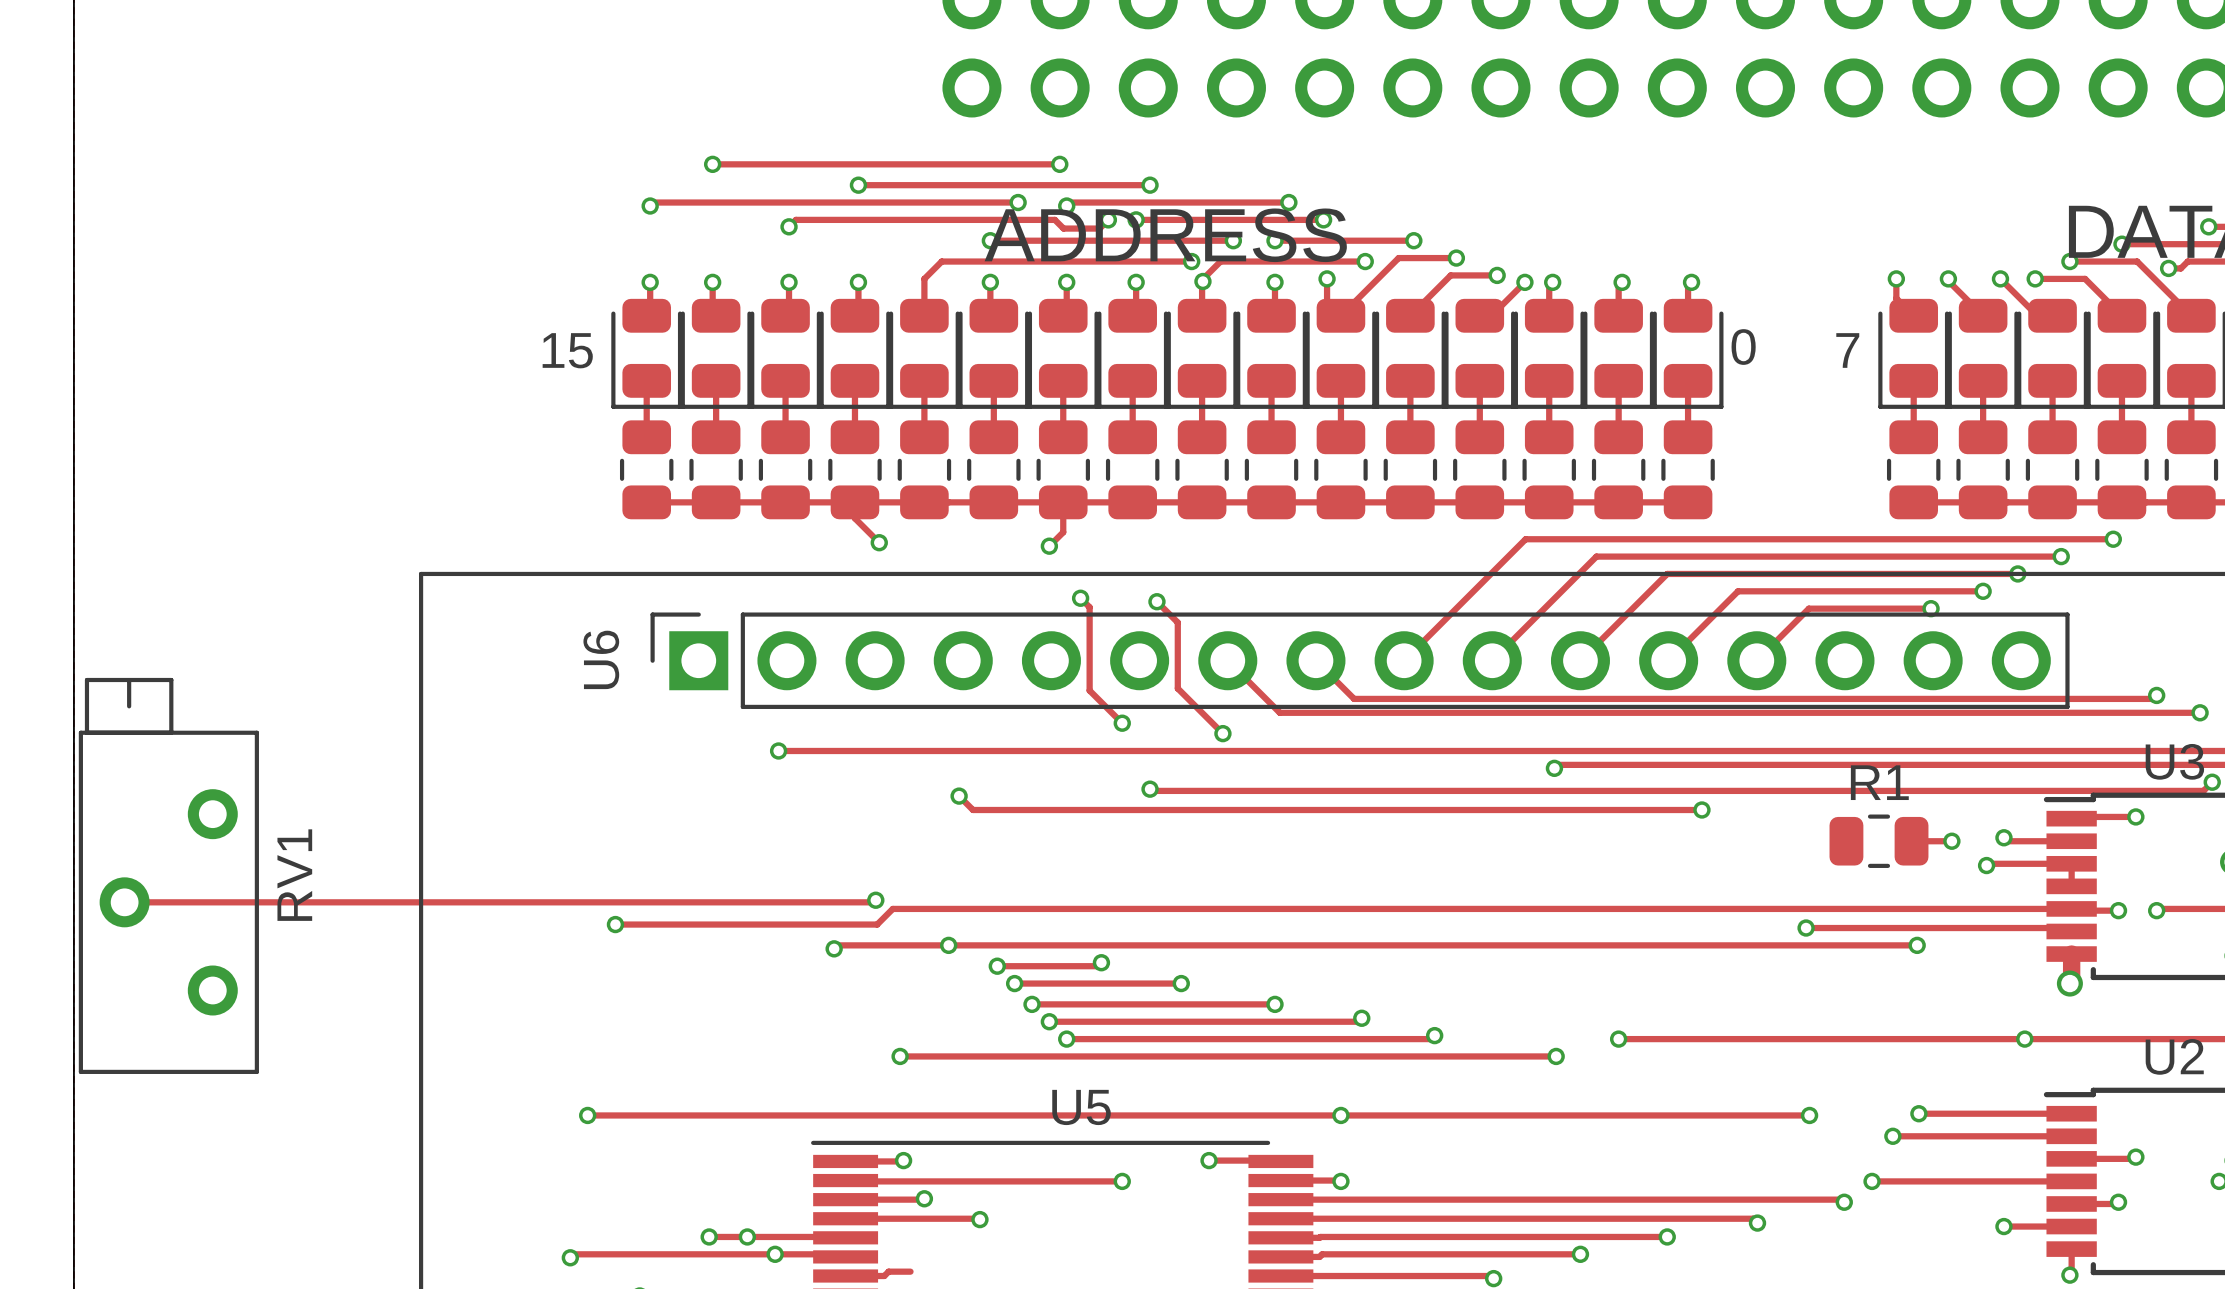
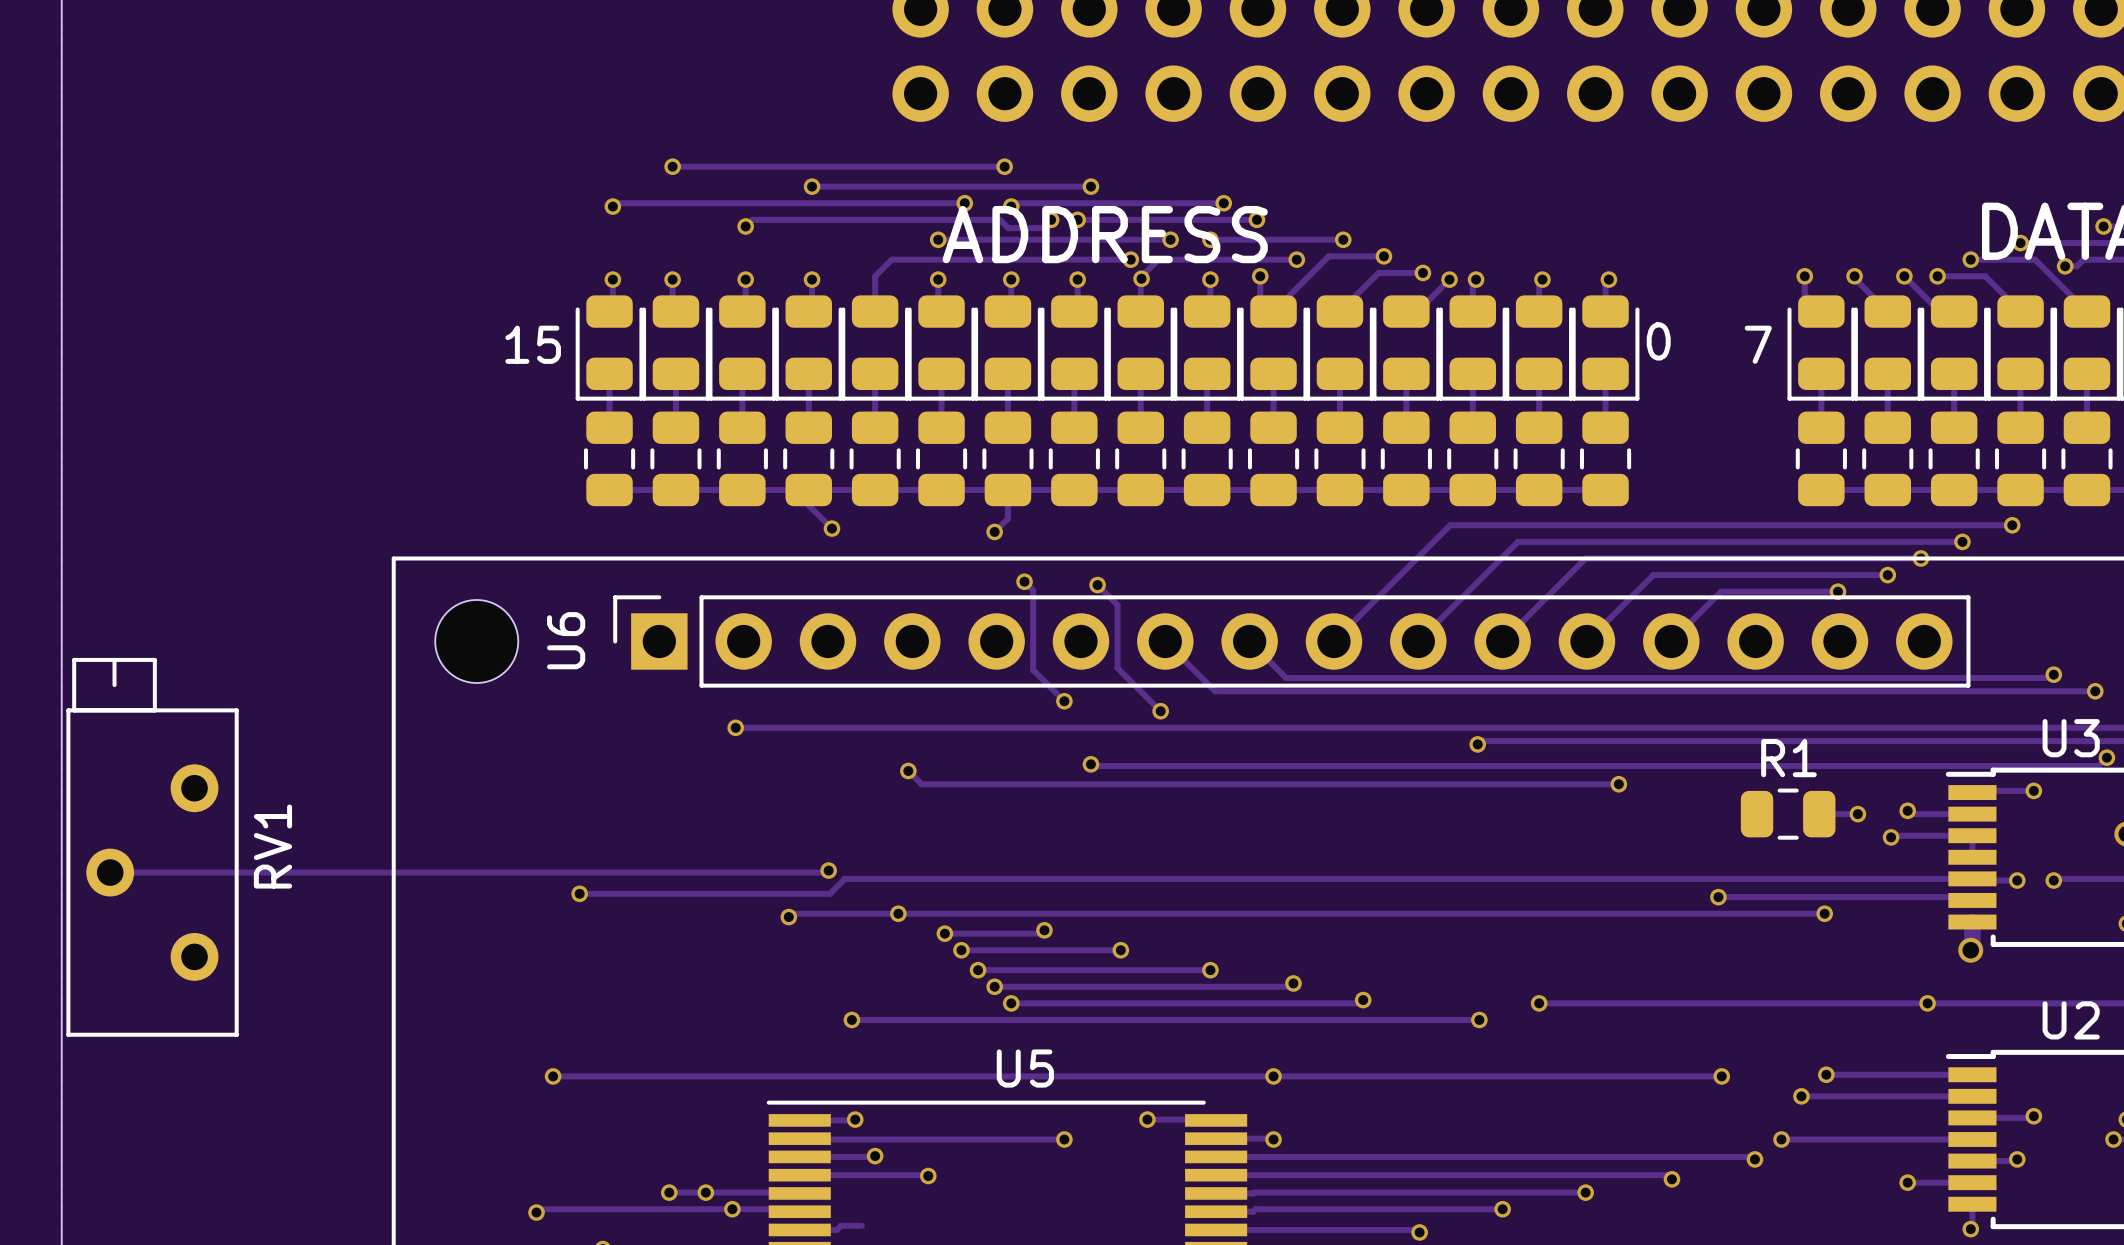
part: none -> (476, 641)

